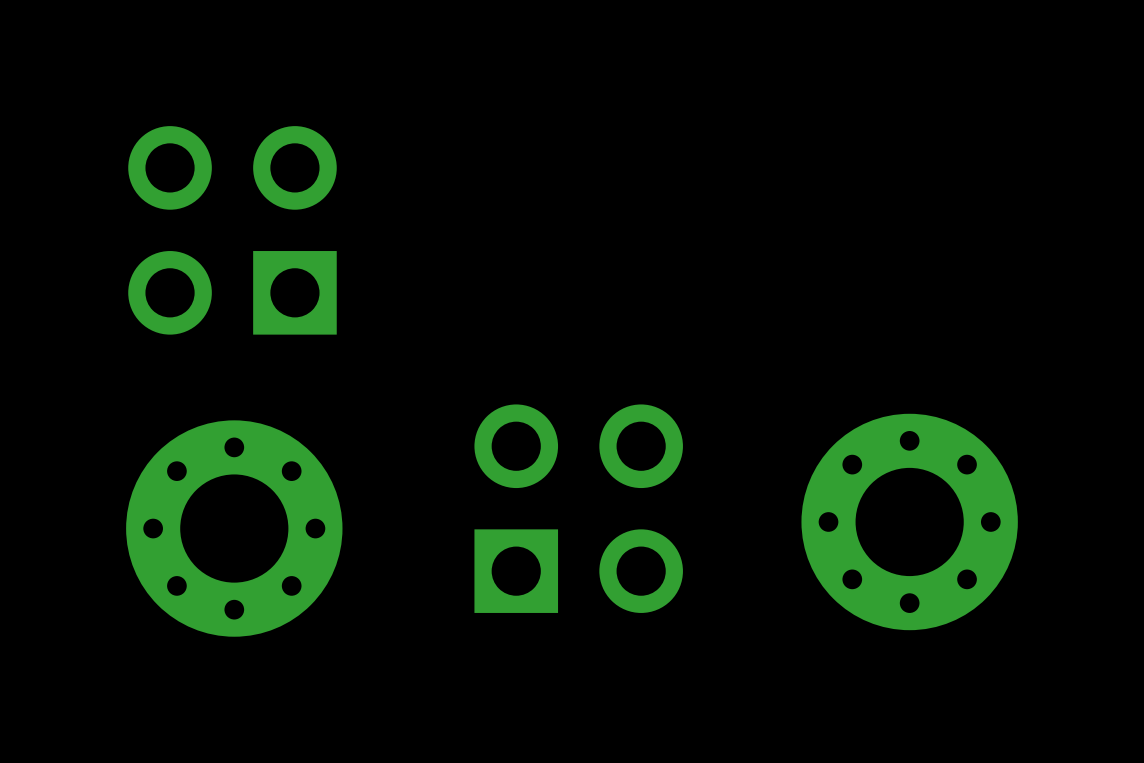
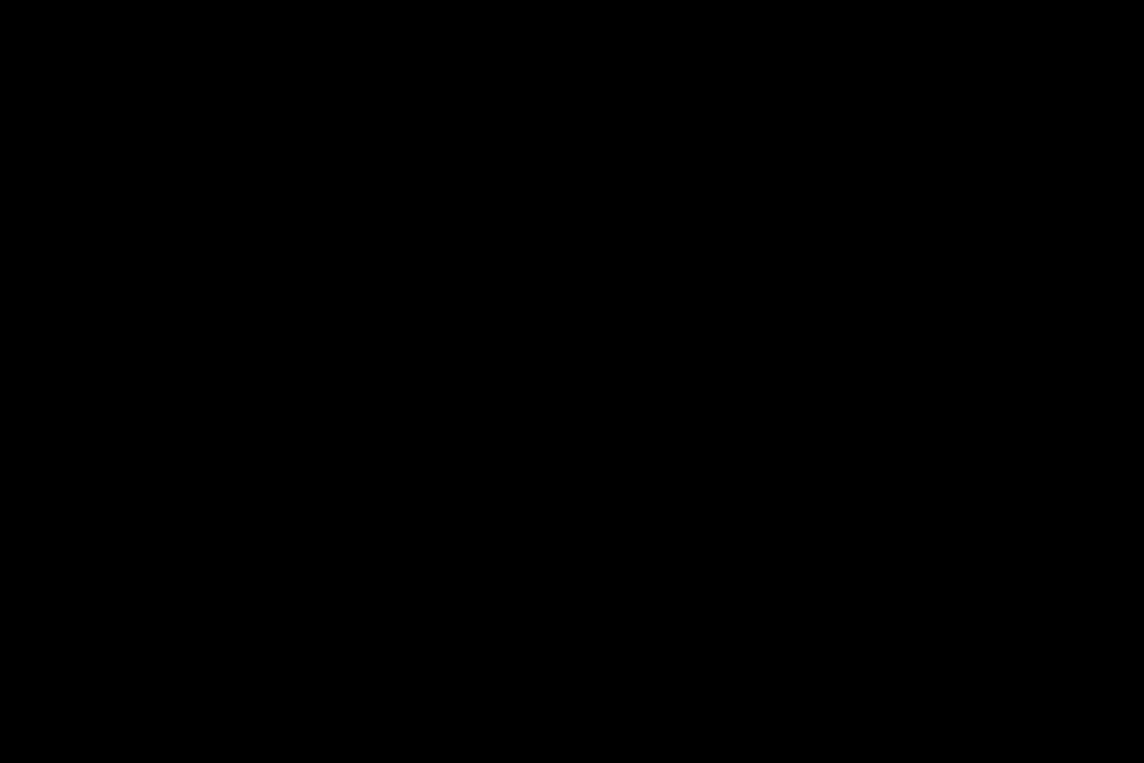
part: (232, 230) -> none
part: (578, 508) -> none
part: (909, 521) -> none
part: (234, 528) -> none

